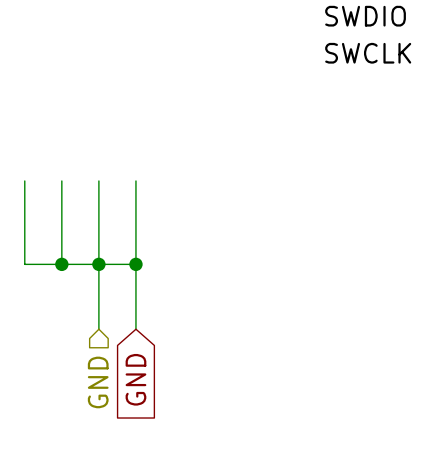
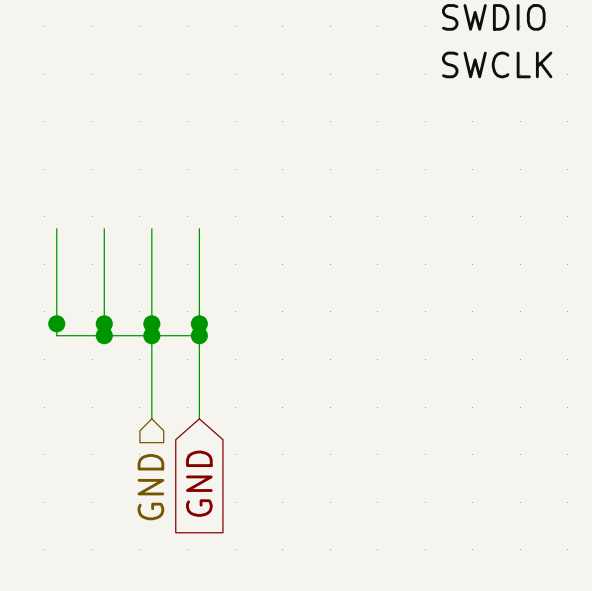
junction: none -> (56, 323)
junction: none -> (104, 323)
junction: none -> (151, 323)
junction: none -> (199, 323)

